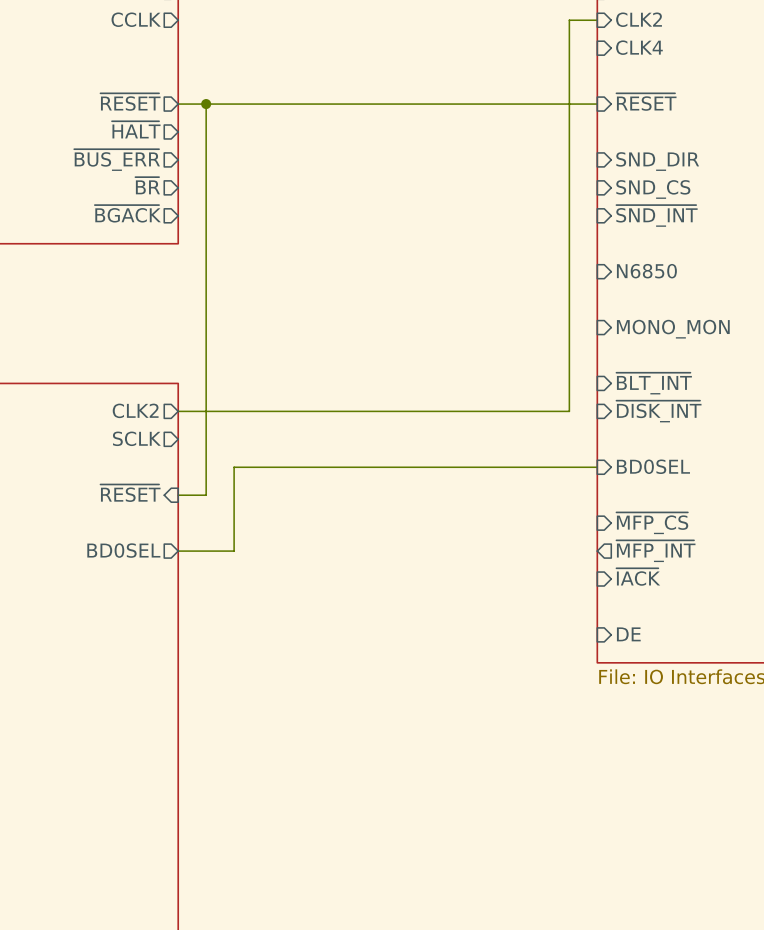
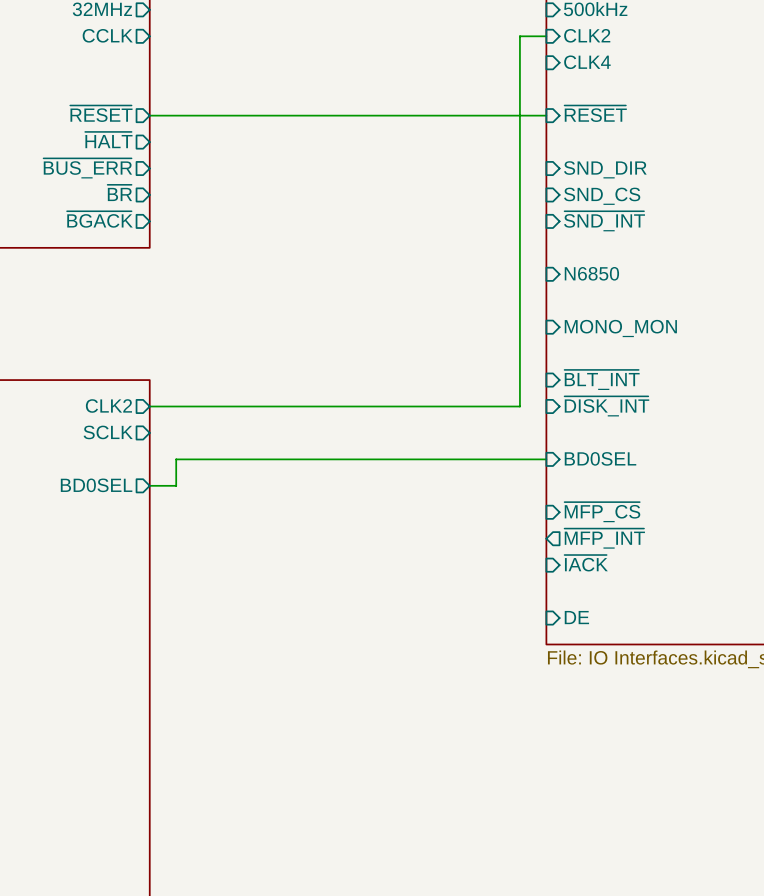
wire: (206, 104) (206, 467) -> none
junction: (206, 104) -> none
wire: (234, 467) (234, 551) (178, 551) -> (202, 459) (176, 459)
sheet pin shape: input (130, 493) -> output (96, 485)
sheet pin: ~{RESET} (130, 493) -> BD0SEL (96, 485)
sheet pin: BD0SEL (123, 550) -> none

